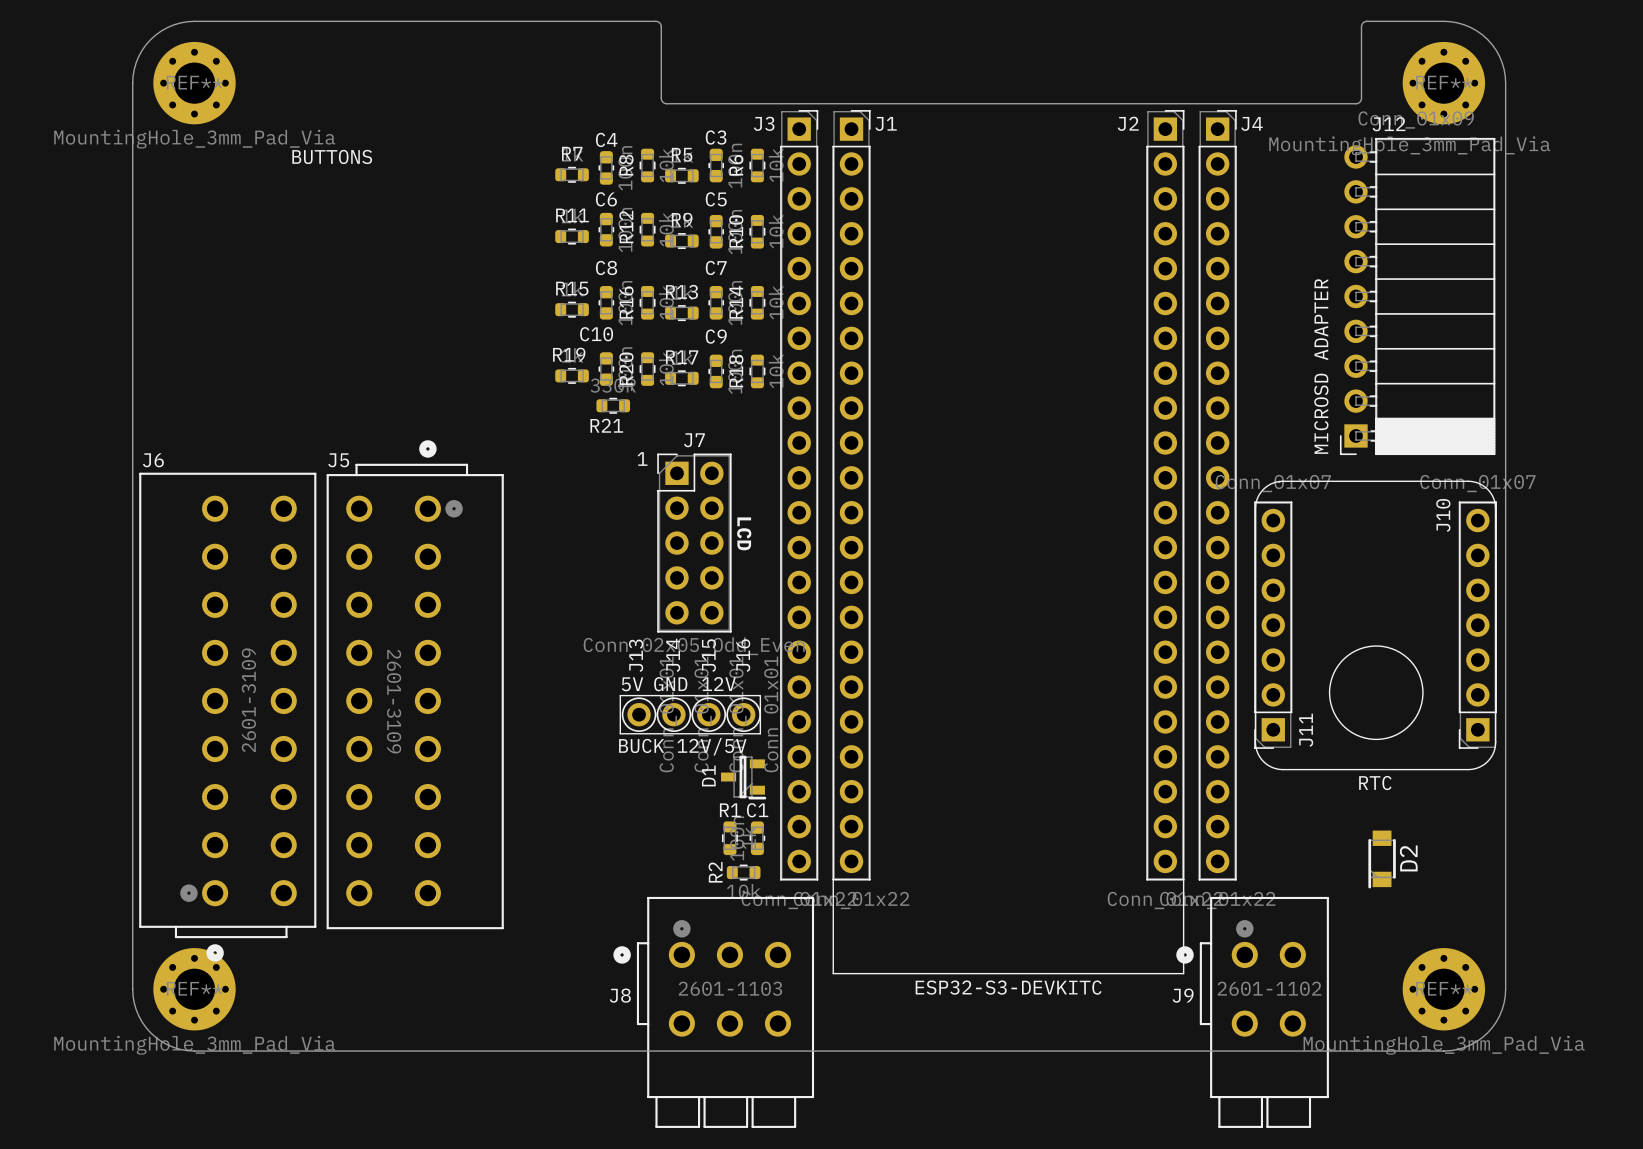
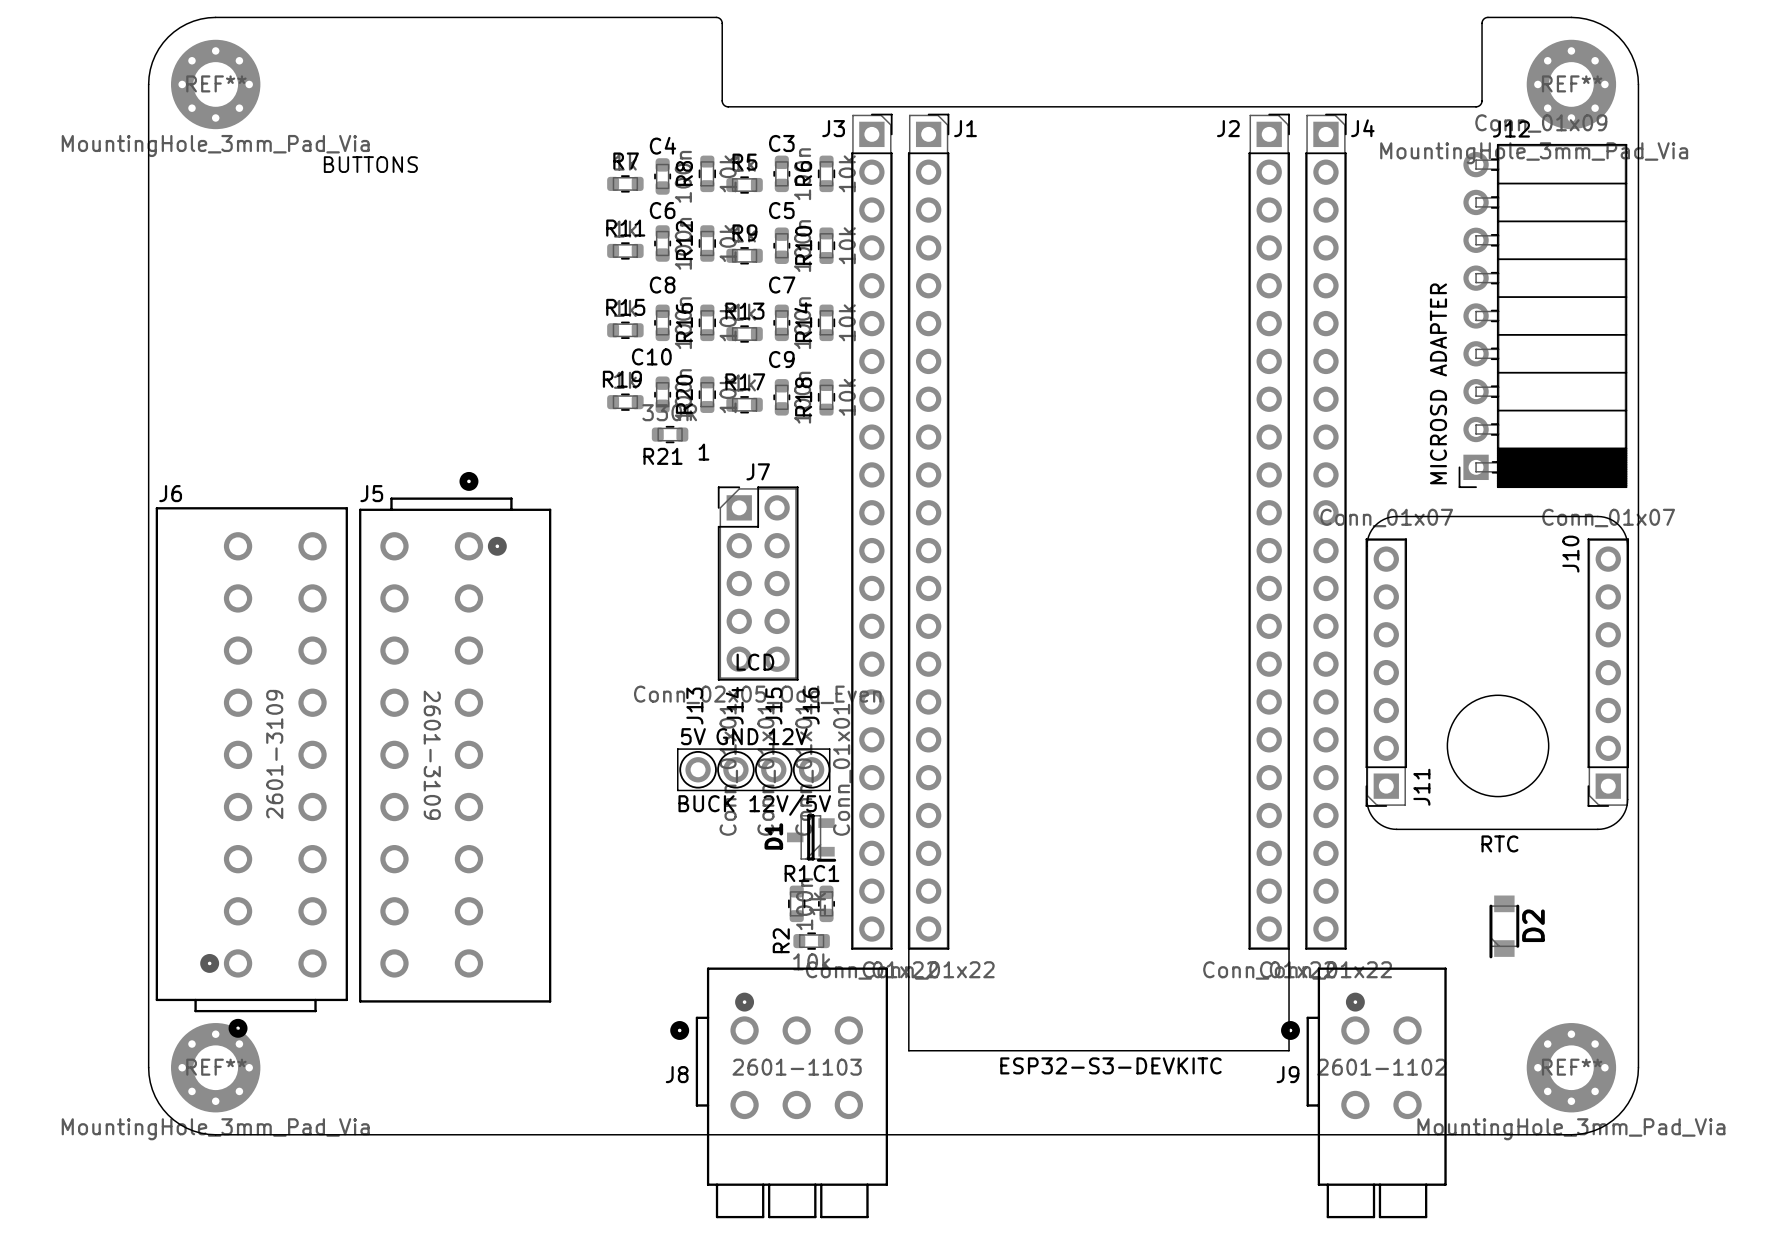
text position: 1 (642, 459) -> 1 (703, 452)
text rotation: 0° (744, 533) -> 90° counterclockwise (755, 662)
text position: LCD (744, 533) -> LCD (755, 662)

